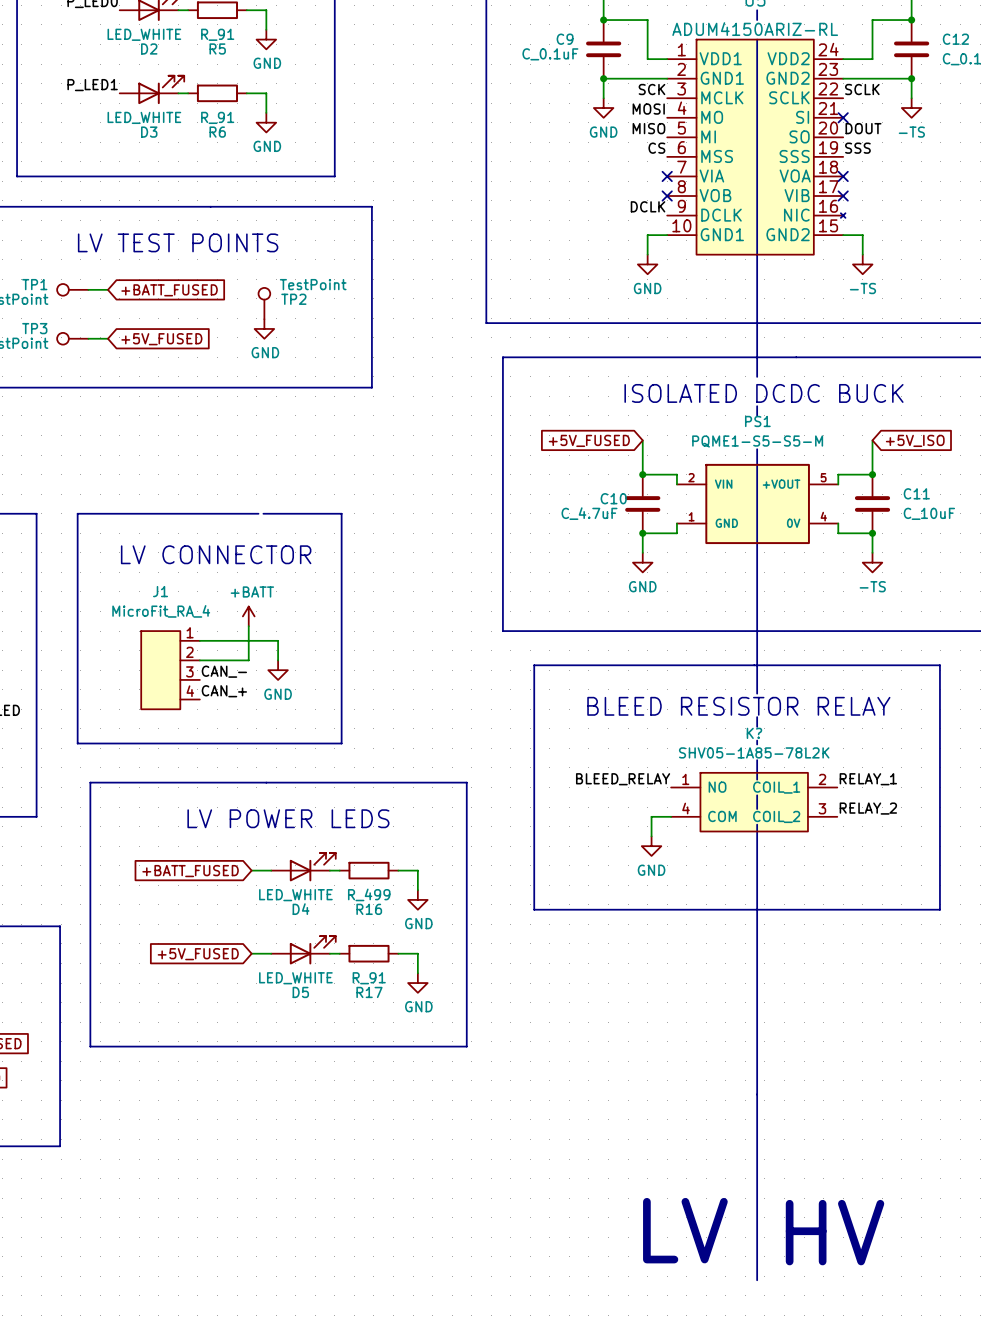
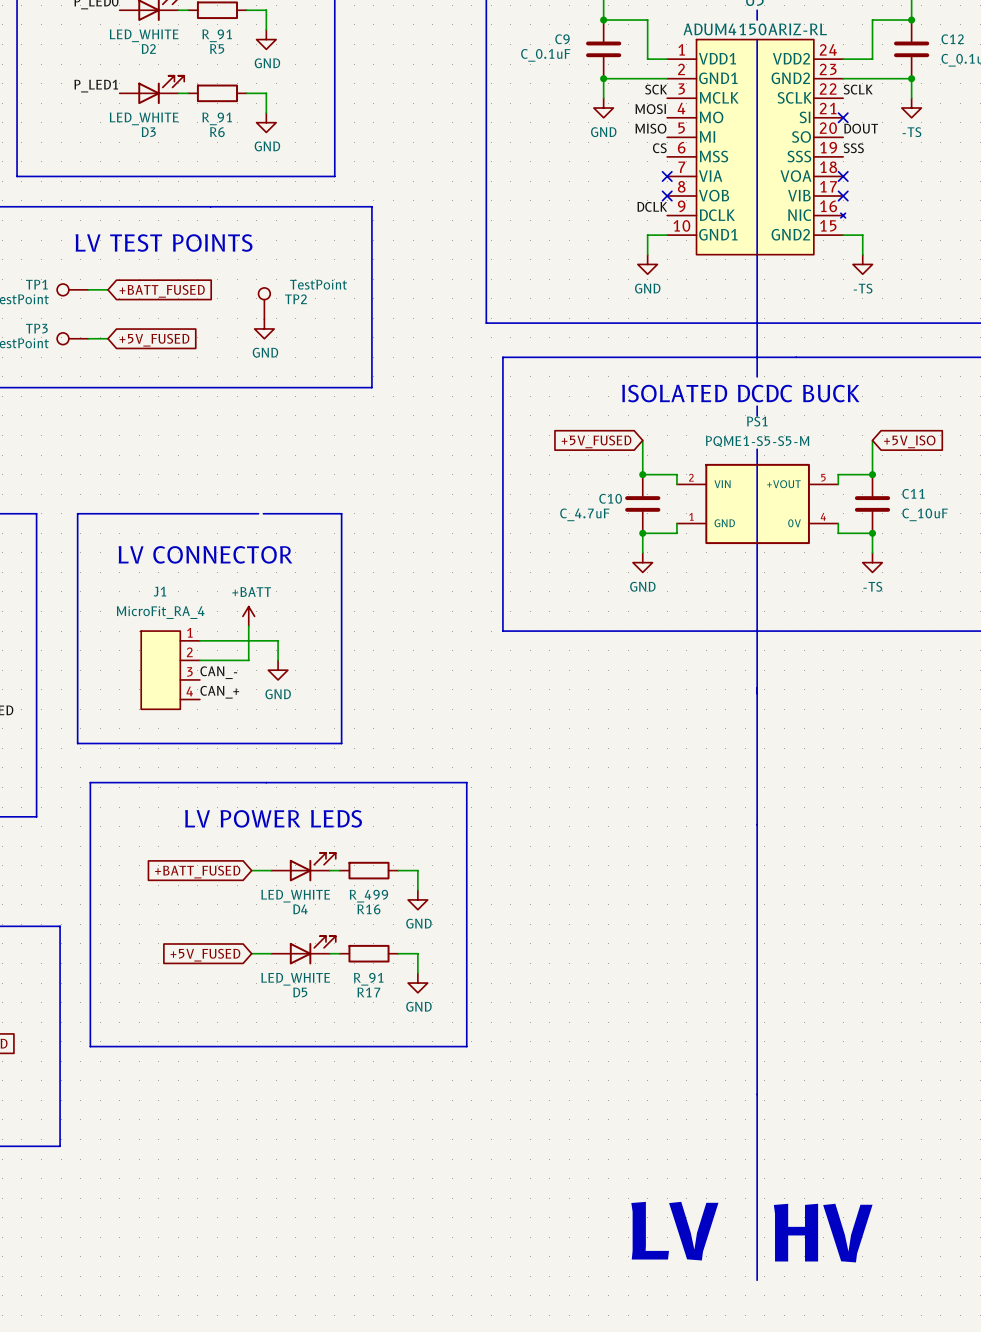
line: (534, 665) (534, 909) (939, 909) (939, 665) (534, 665) -> none
line: none -> (757, 693) (757, 717)
text: BLEED RESISTOR RELAY (738, 706) -> none
line: none -> (757, 726) (757, 740)
line: none -> (757, 744) (757, 760)
label: BLEED_RELAY (623, 779) -> none
line: none -> (757, 779) (757, 795)
label: RELAY_1 (868, 779) -> none
K?: SHV05-1A85-78L2K (754, 802) -> none
label: RELAY_2 (868, 808) -> none
line: none -> (757, 809) (757, 824)
wire: (671, 816) (651, 816) (651, 836) -> none
power symbol: GND (651, 846) -> none

